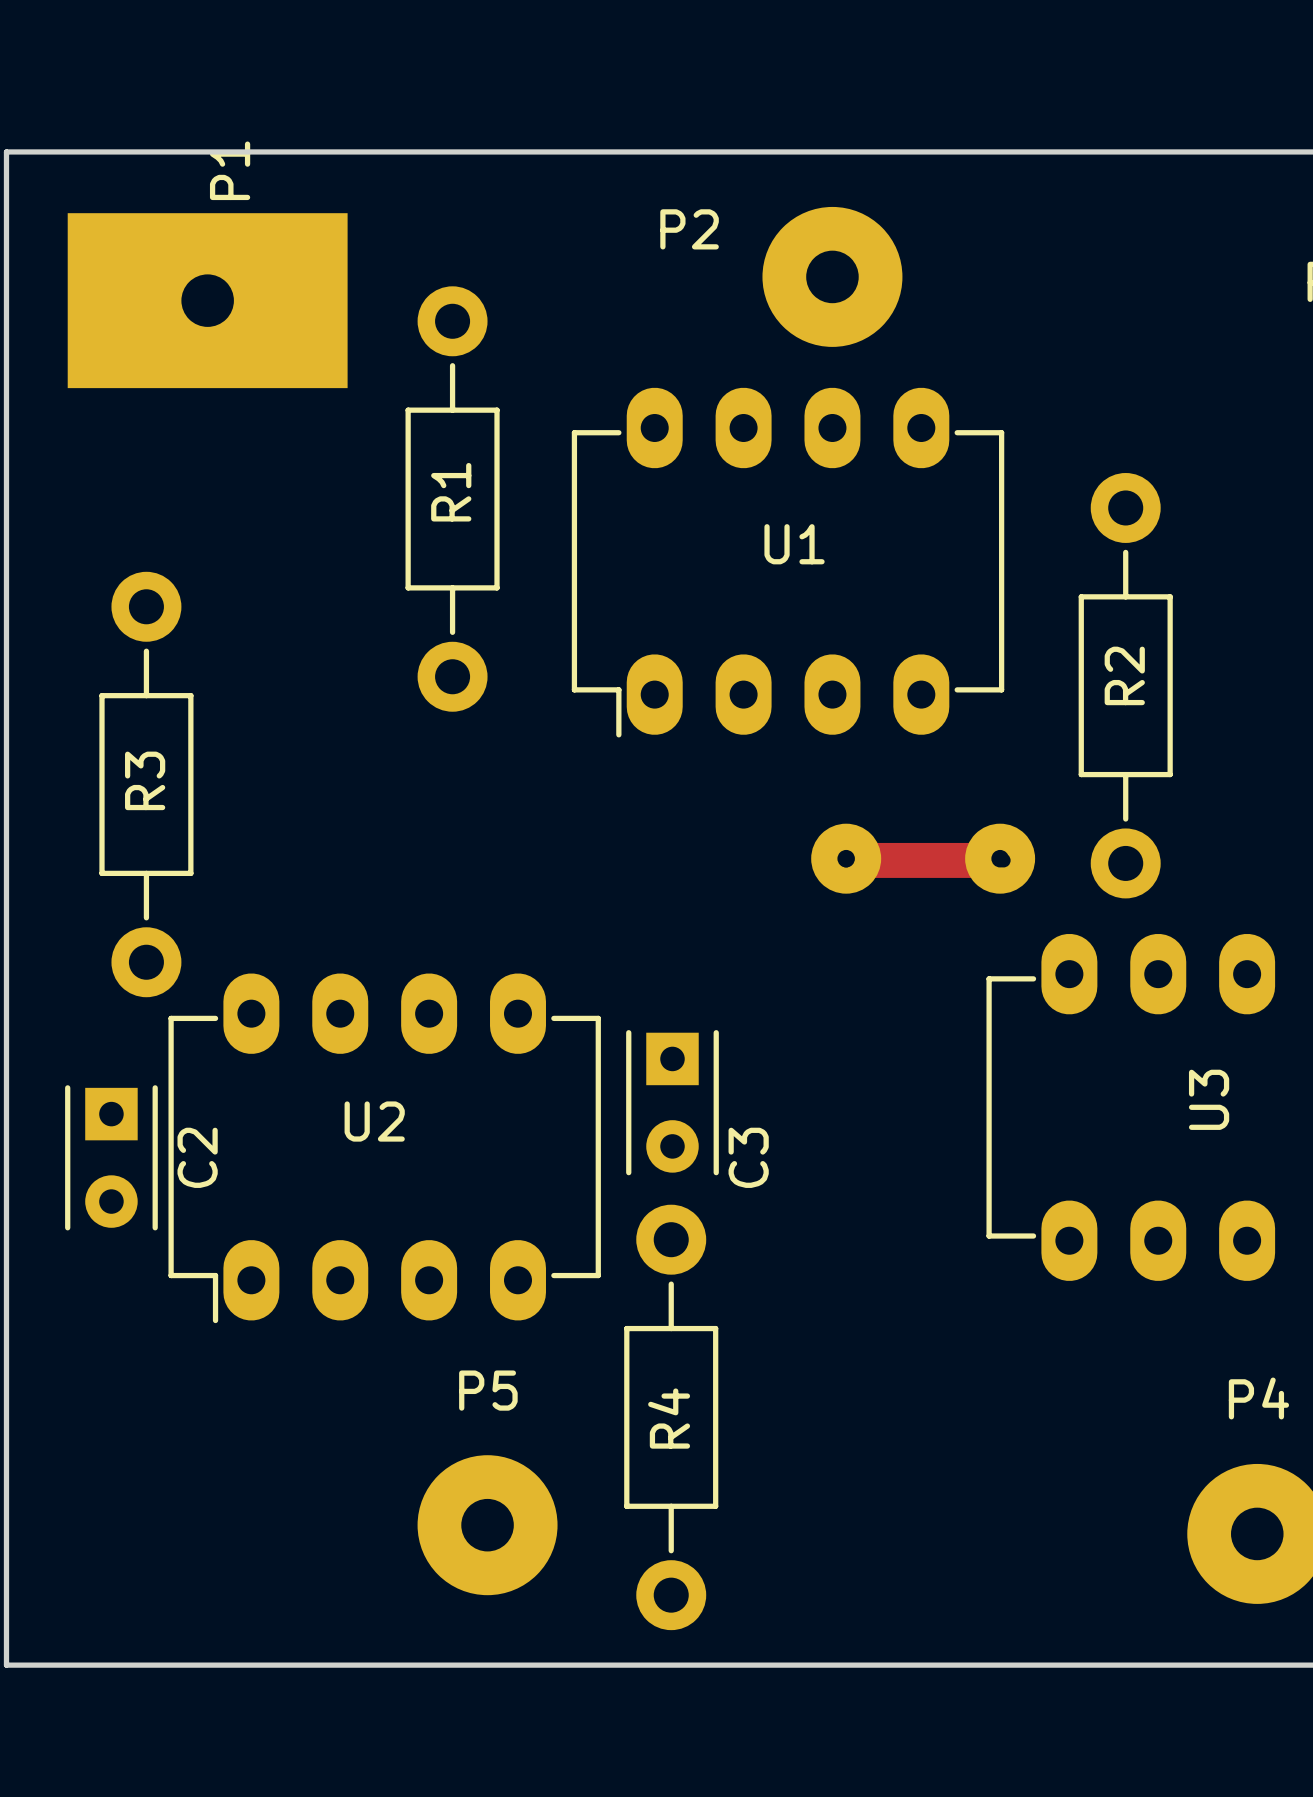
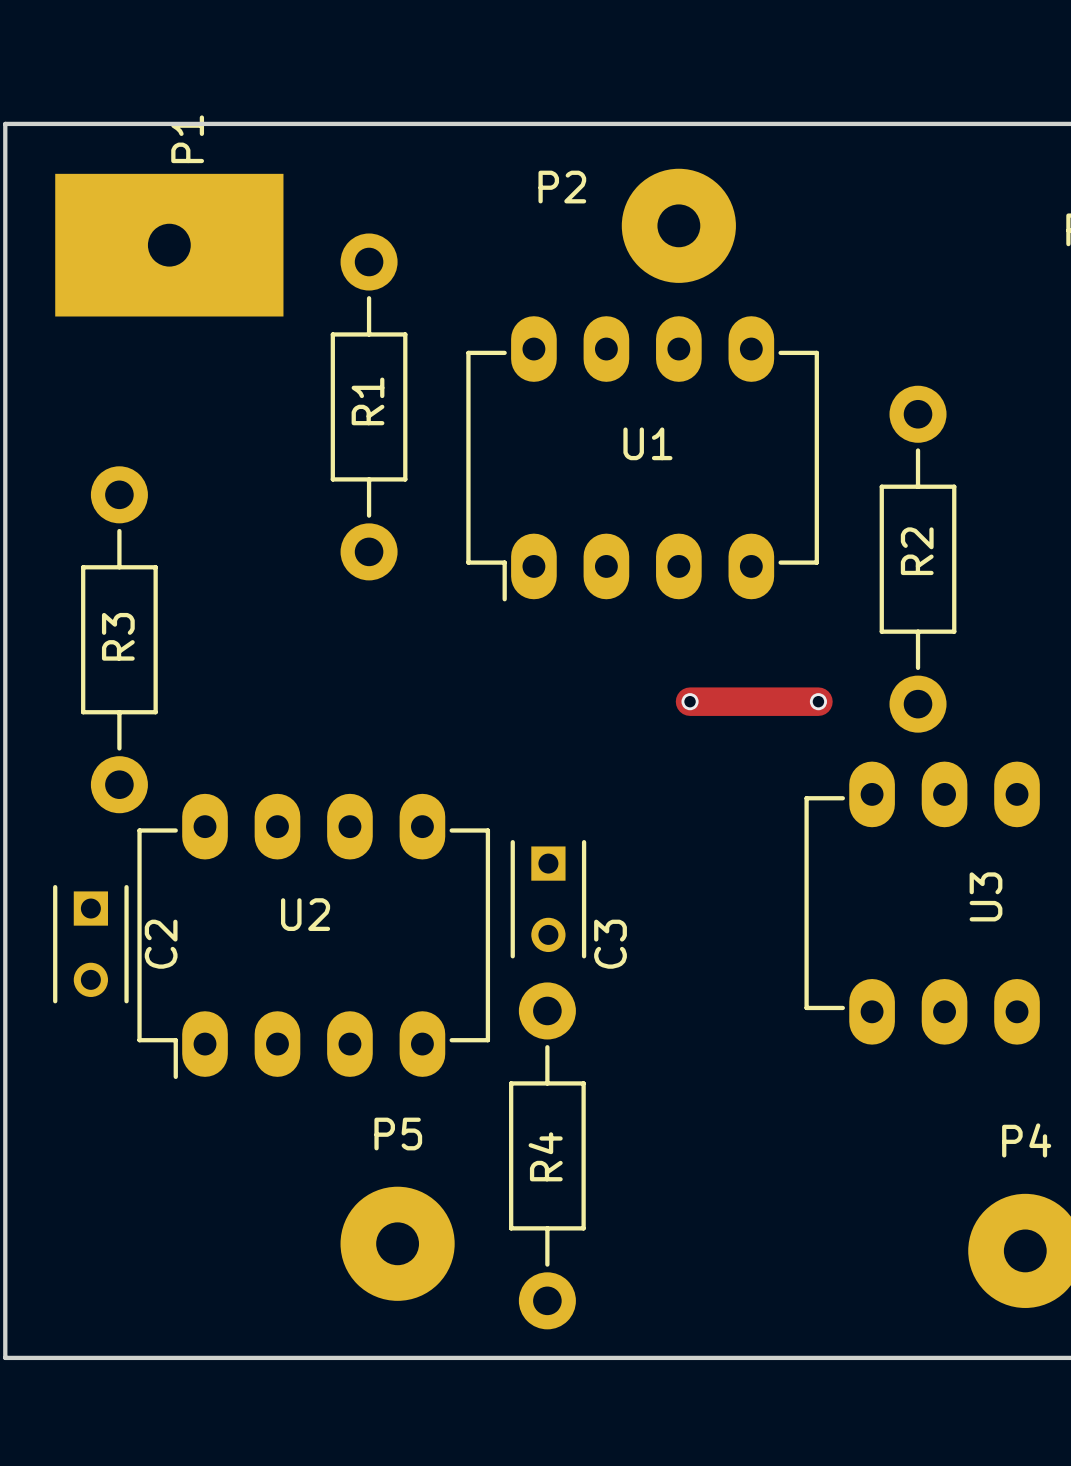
part: (846, 858) -> none
part: (1000, 858) -> none
C3 footprint: [626, 1030, 719, 1176] -> [510, 840, 587, 959]
C2 footprint: [65, 1085, 158, 1231] -> [53, 884, 129, 1004]

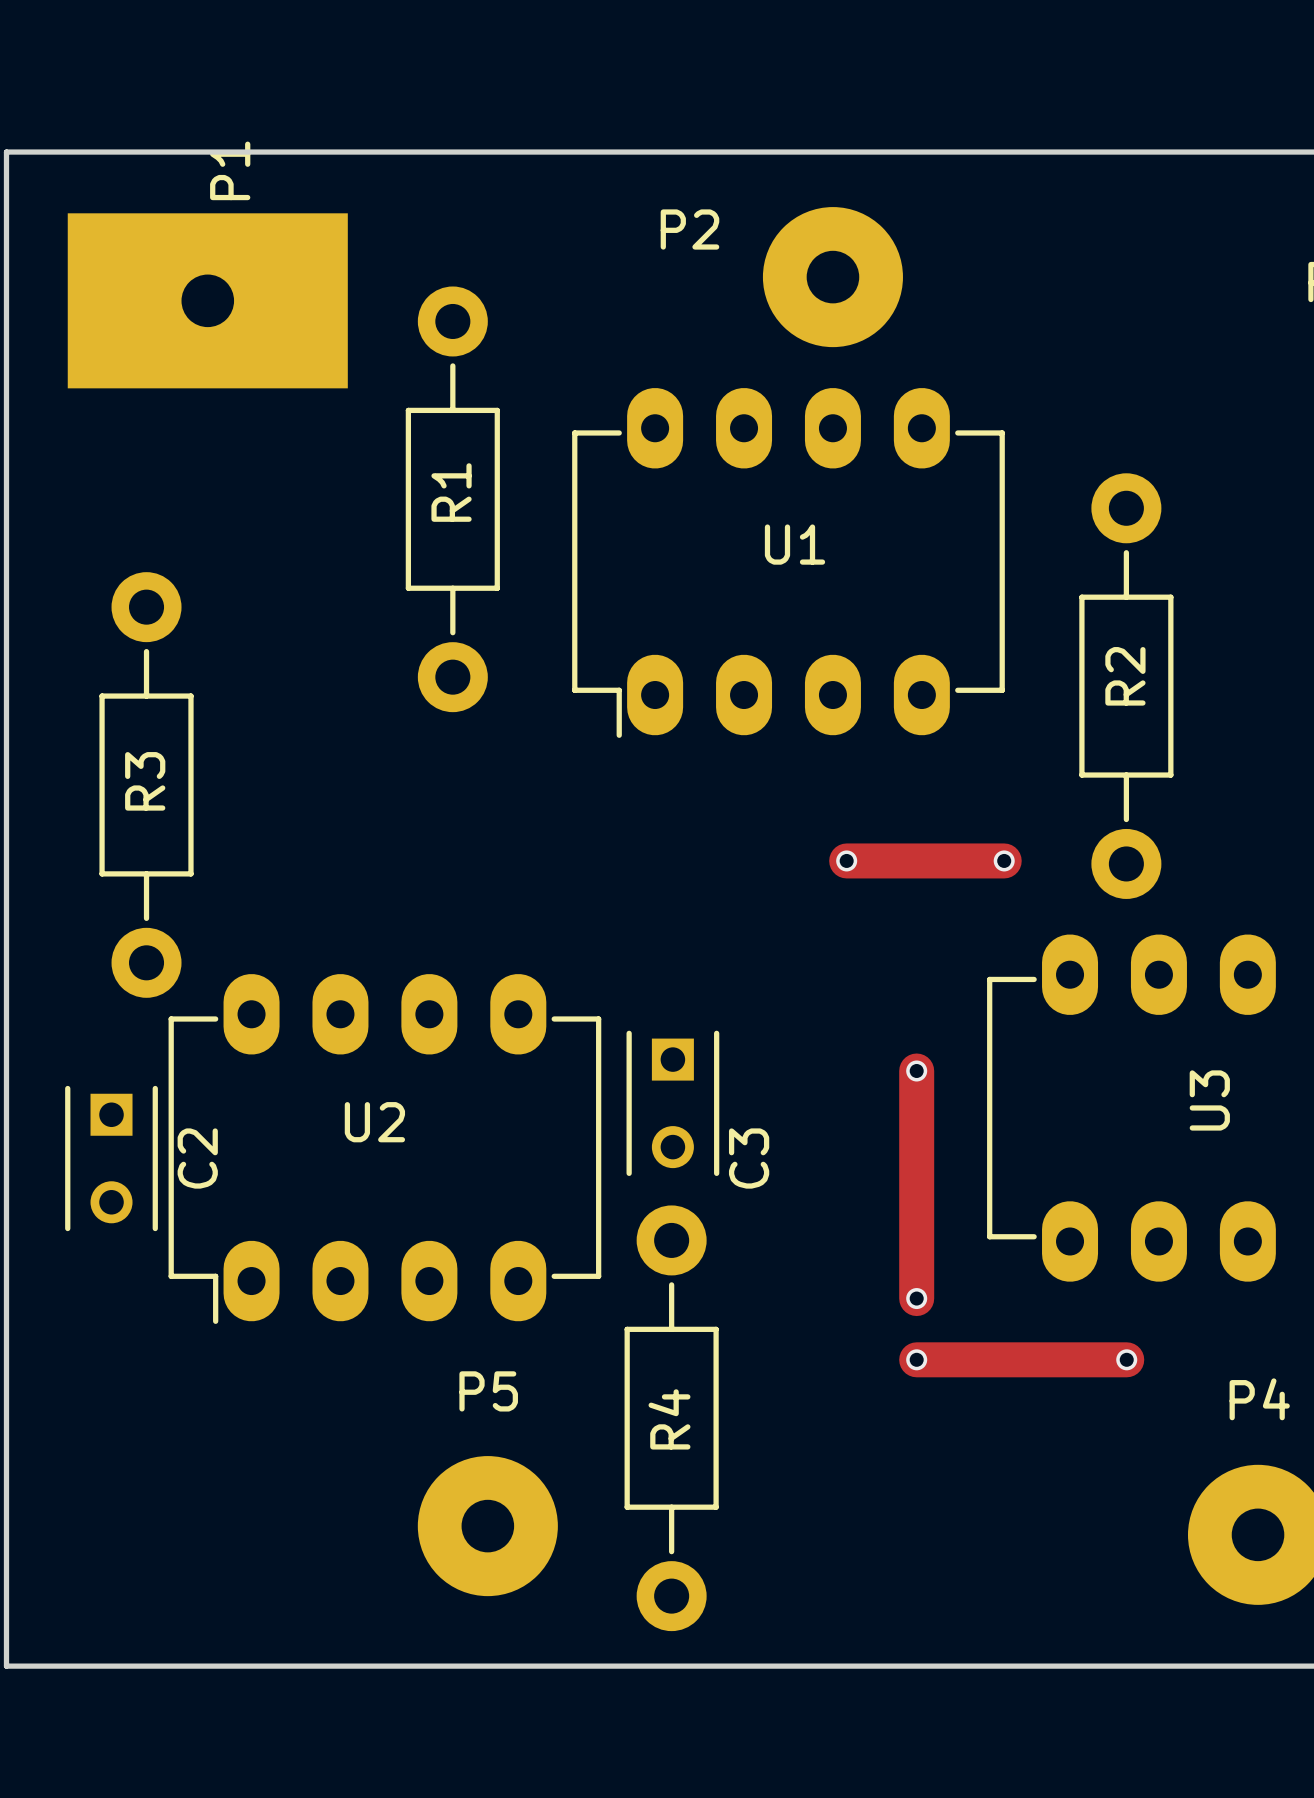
track: none -> (916, 1070) (916, 1298)
via: none -> (916, 1070)
via: none -> (916, 1298)
track: none -> (916, 1359) (1126, 1359)
via: none -> (916, 1359)
via: none -> (1126, 1359)

